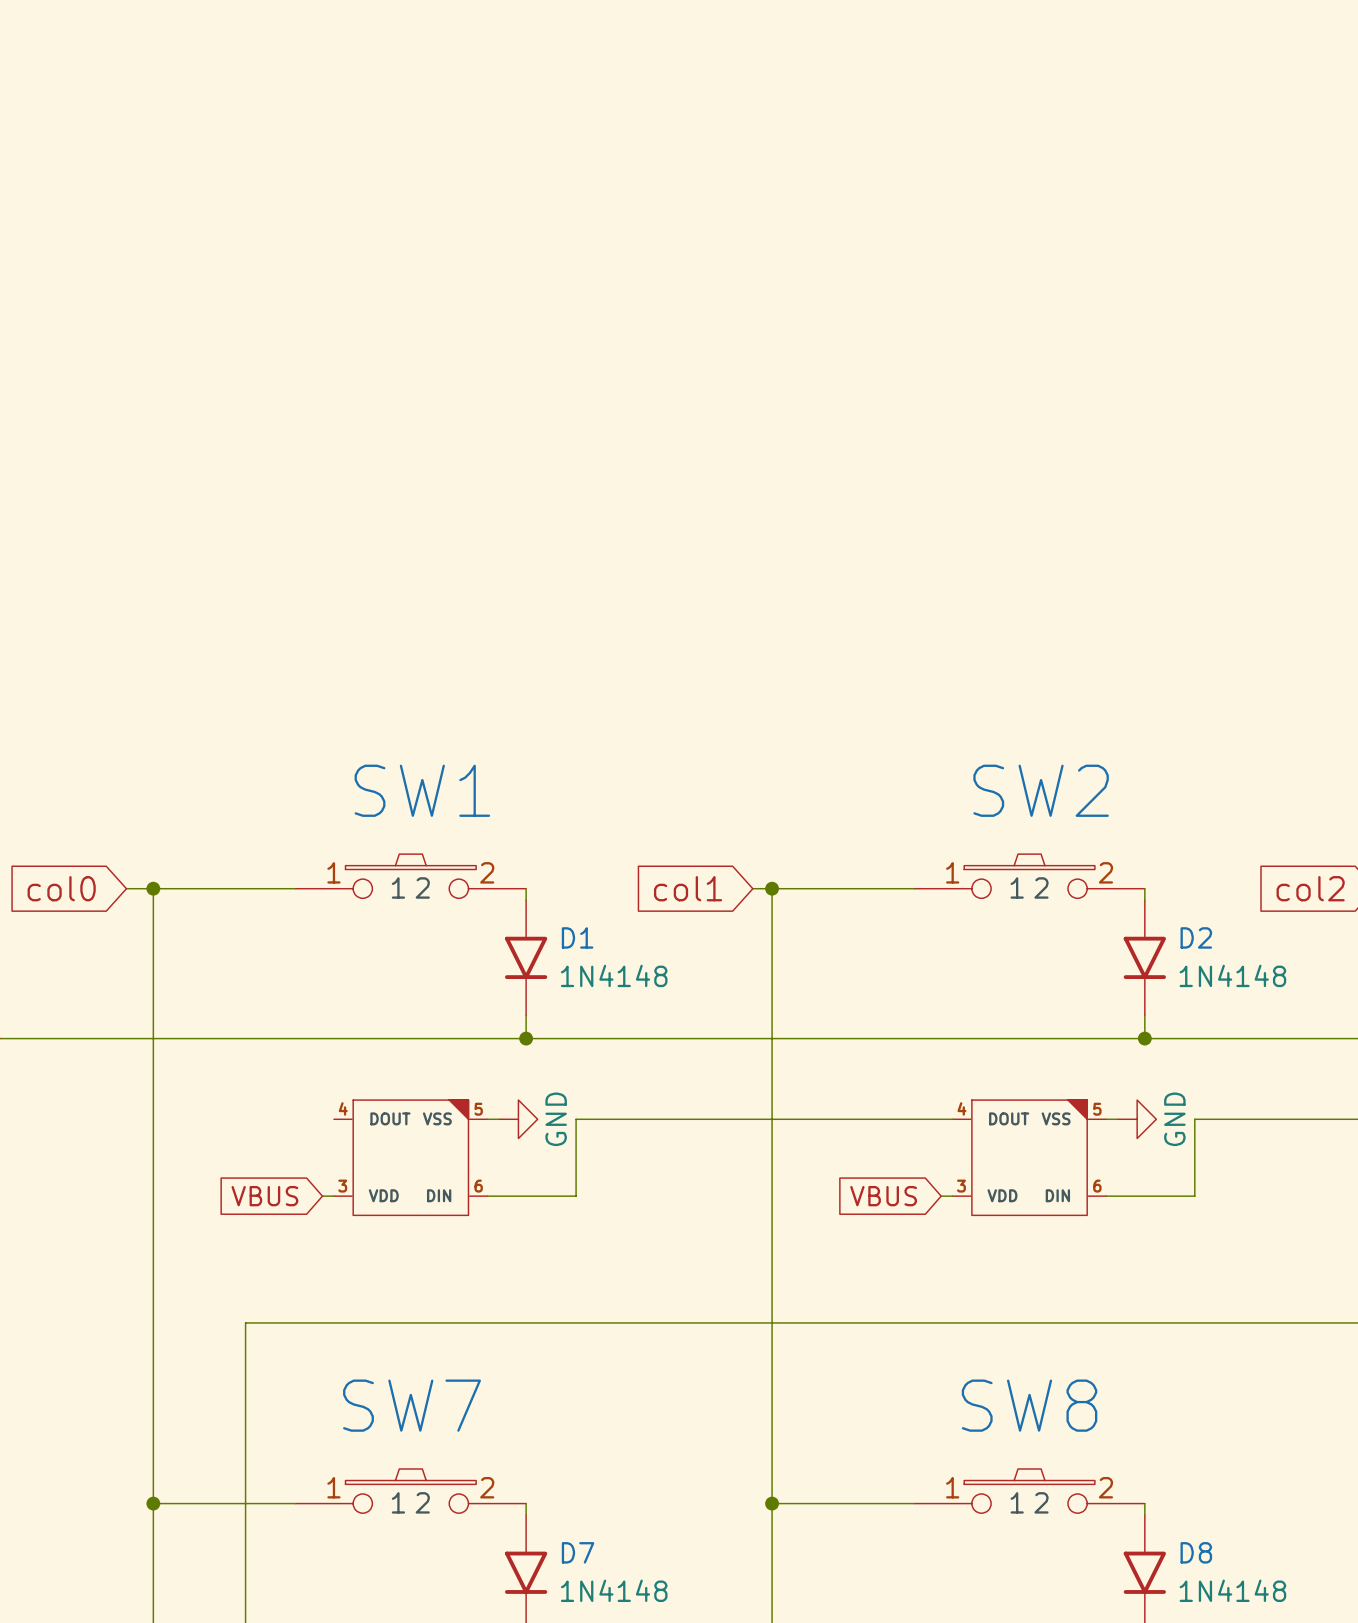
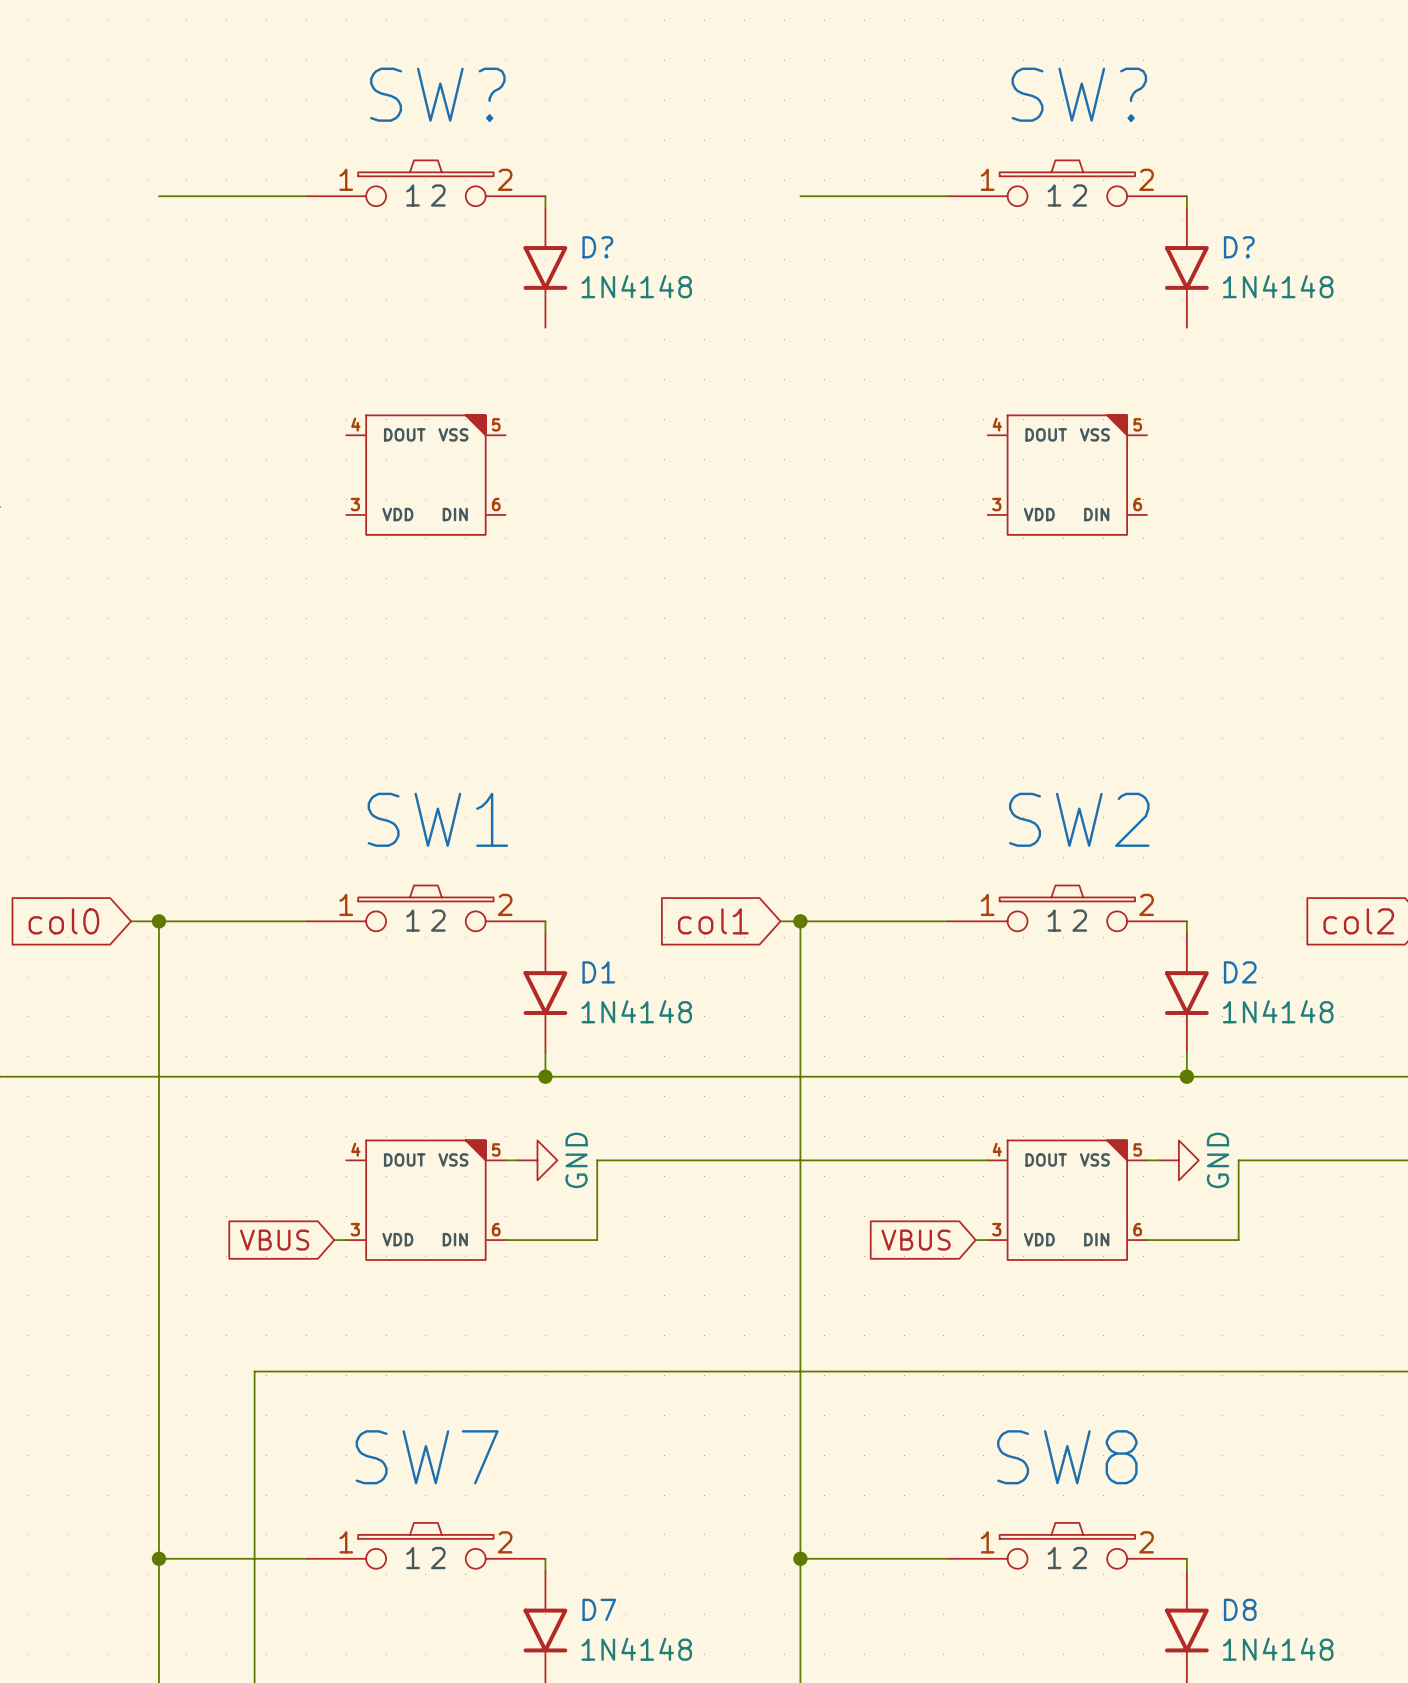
wire: none -> (158, 196) (306, 196)
wire: none -> (545, 196) (545, 208)
wire: none -> (800, 196) (947, 196)
wire: none -> (1186, 196) (1186, 208)
D?: none -> 1N4148 (545, 267)
D?: none -> 1N4148 (1186, 267)
SW?: none -> (425, 347)
SW?: none -> (1067, 347)

